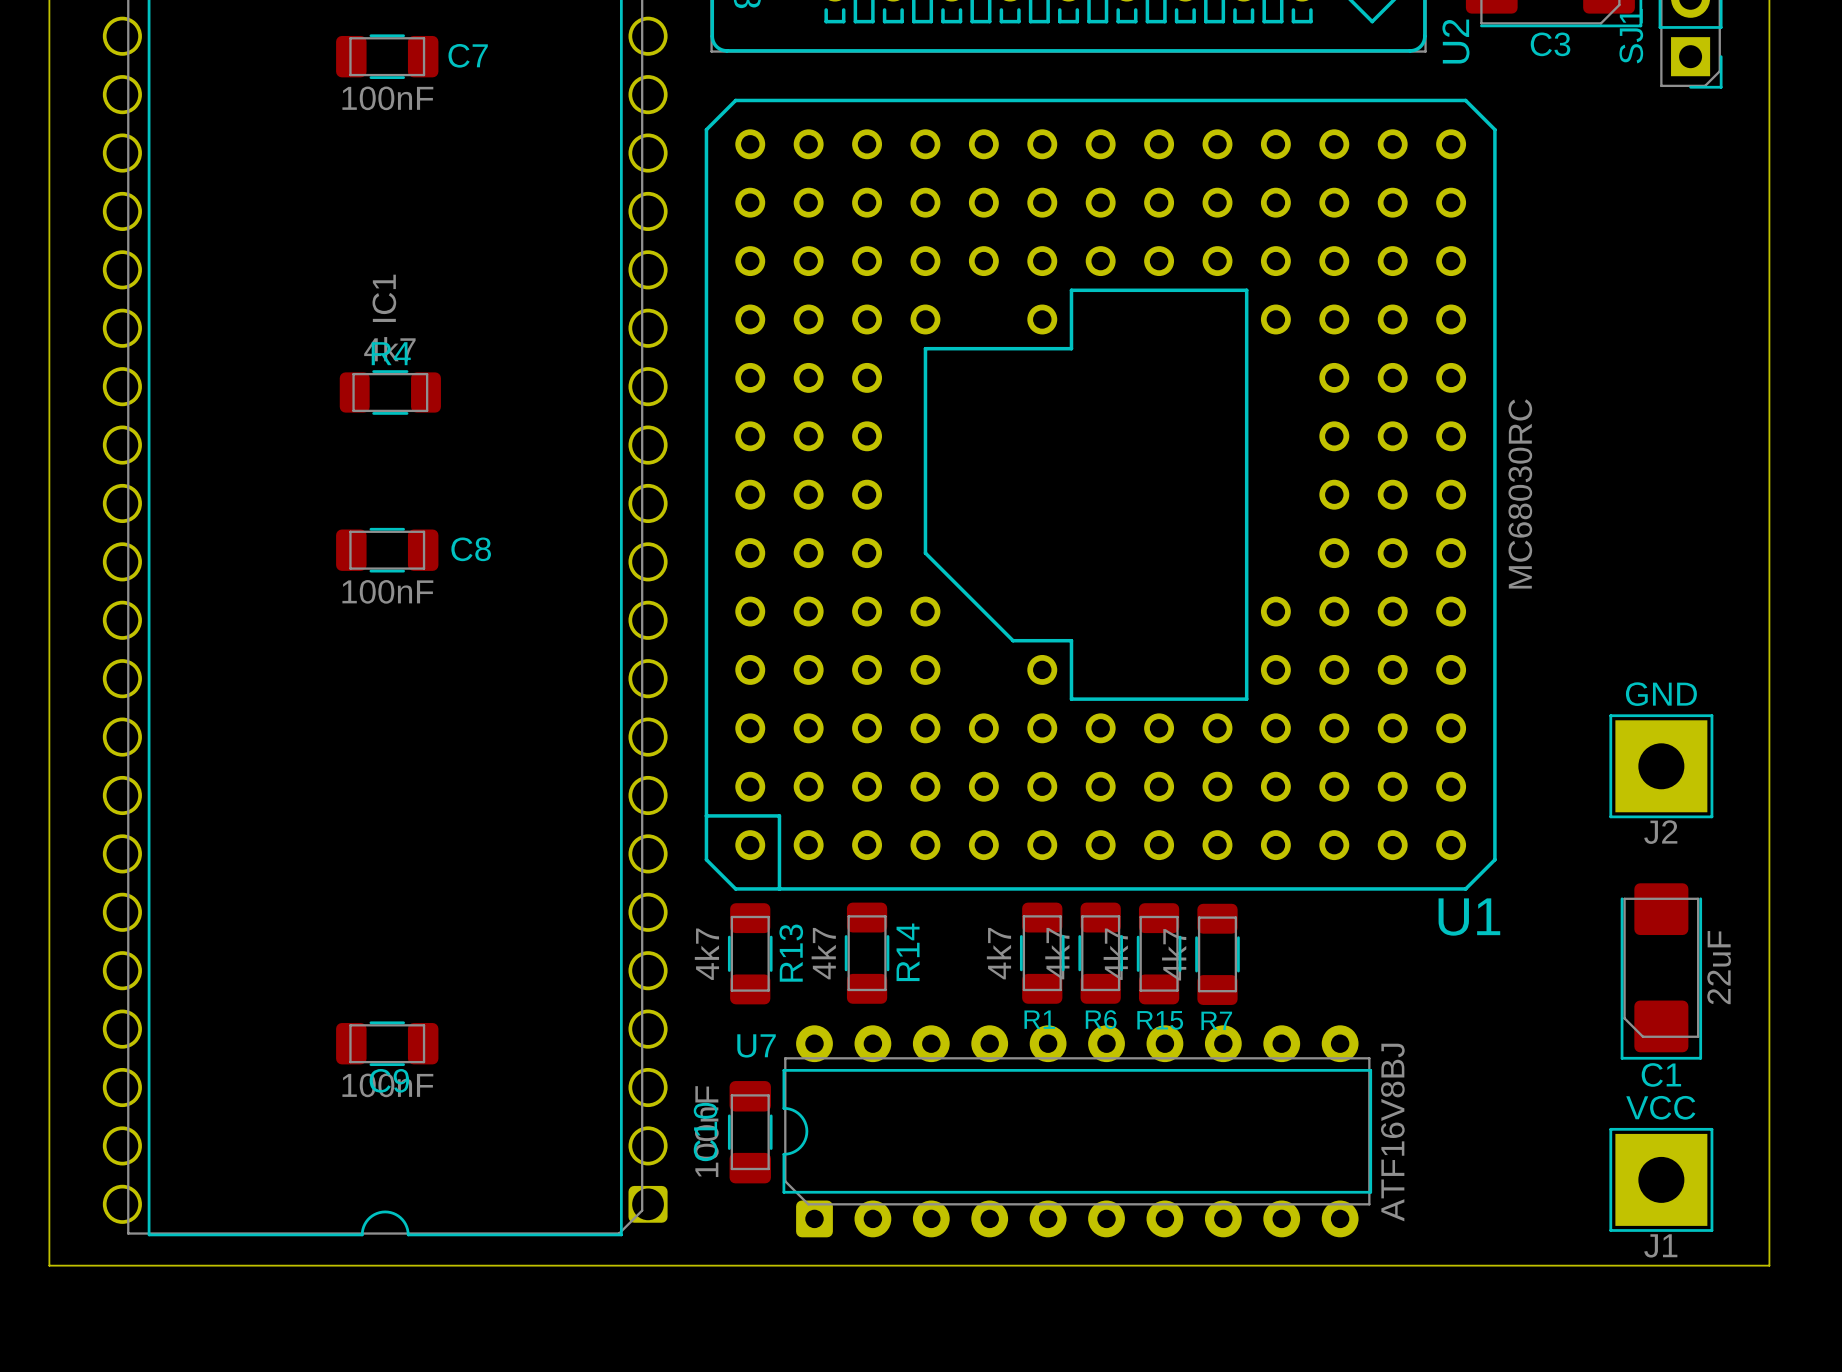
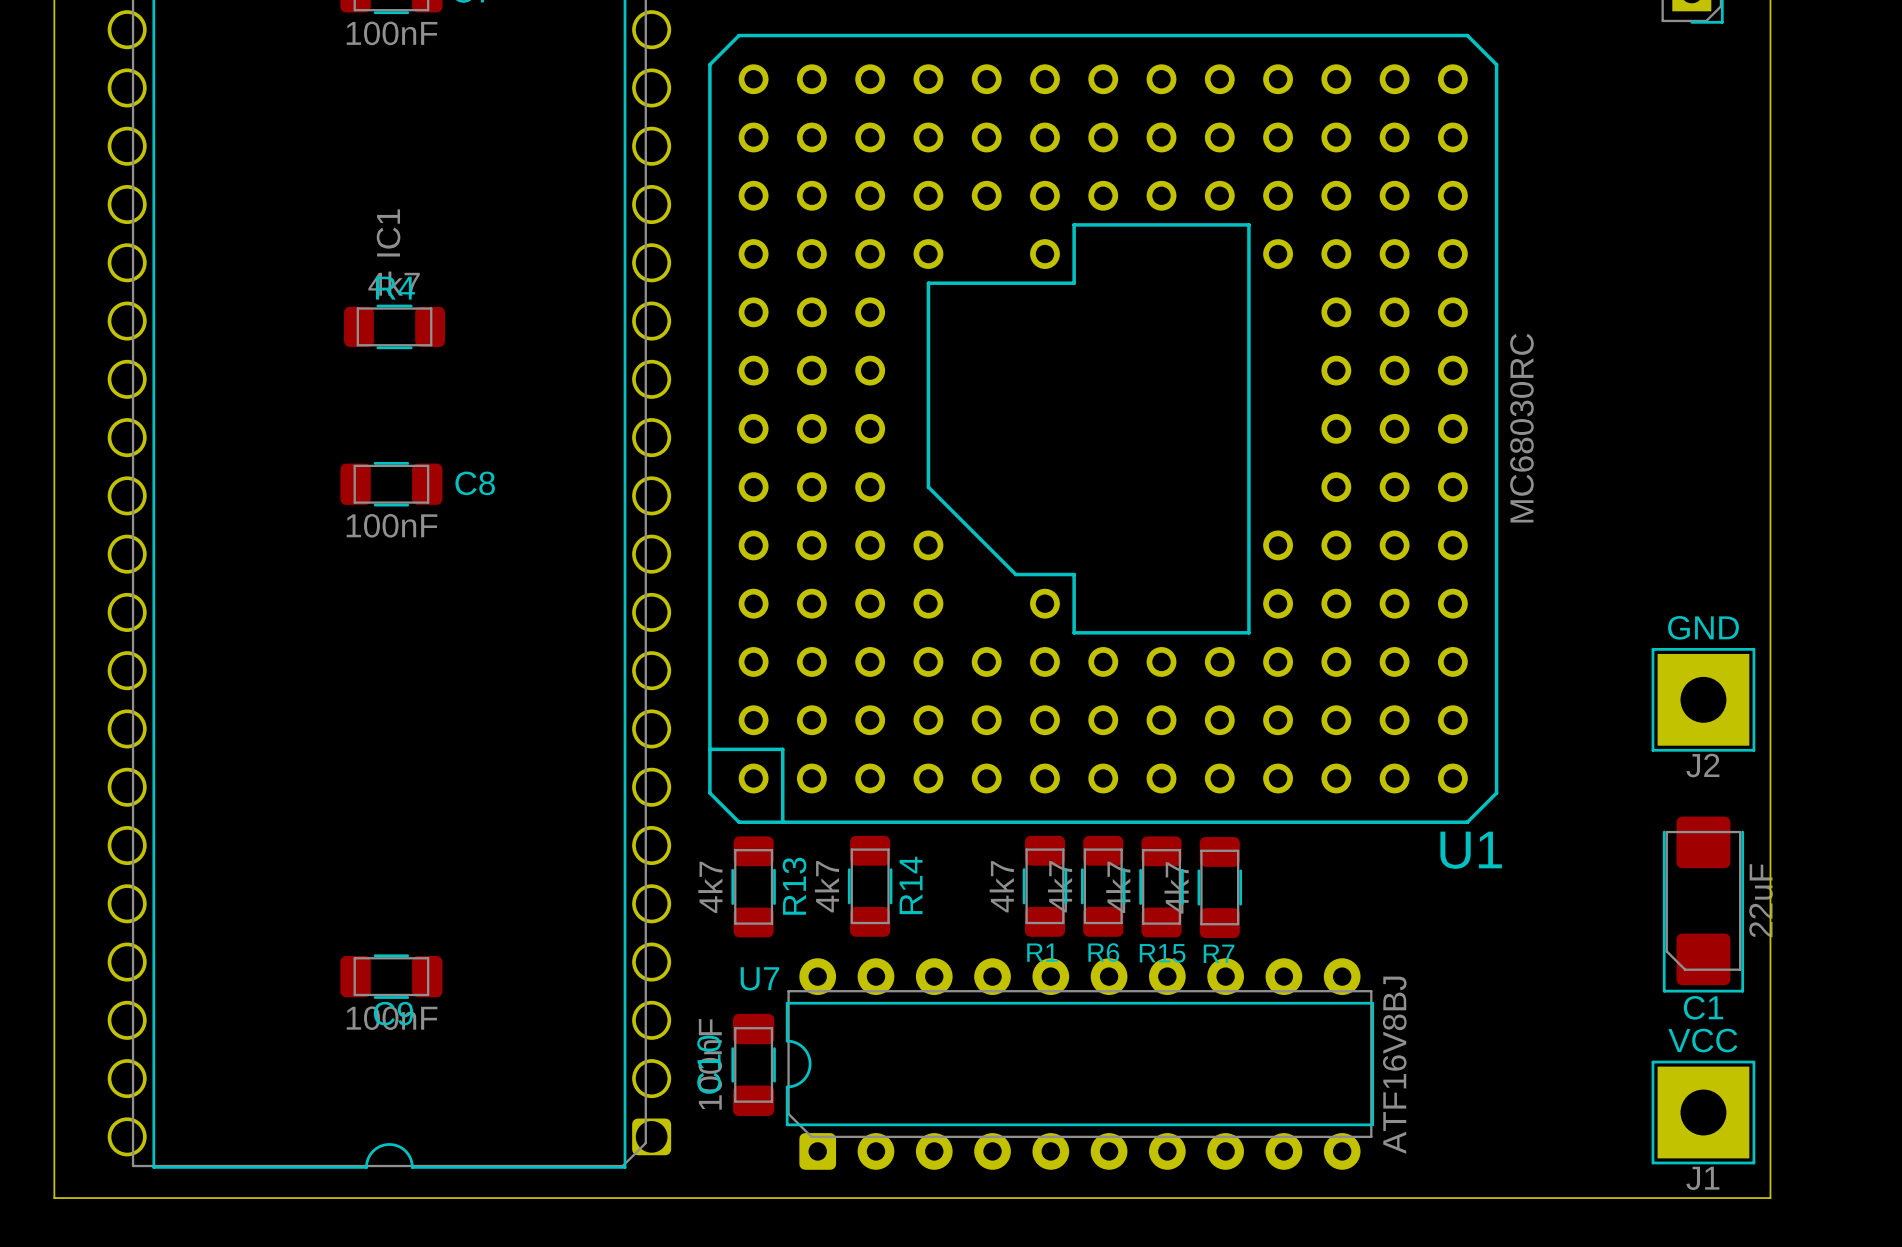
J2 position: (1661, 766) -> (1703, 699)
C1 position: (1661, 971) -> (1703, 904)
J1 position: (1661, 1179) -> (1703, 1112)

